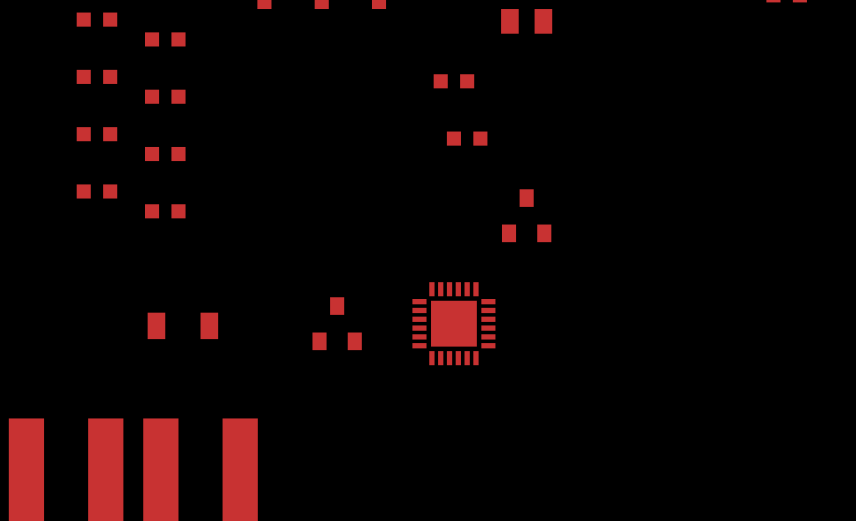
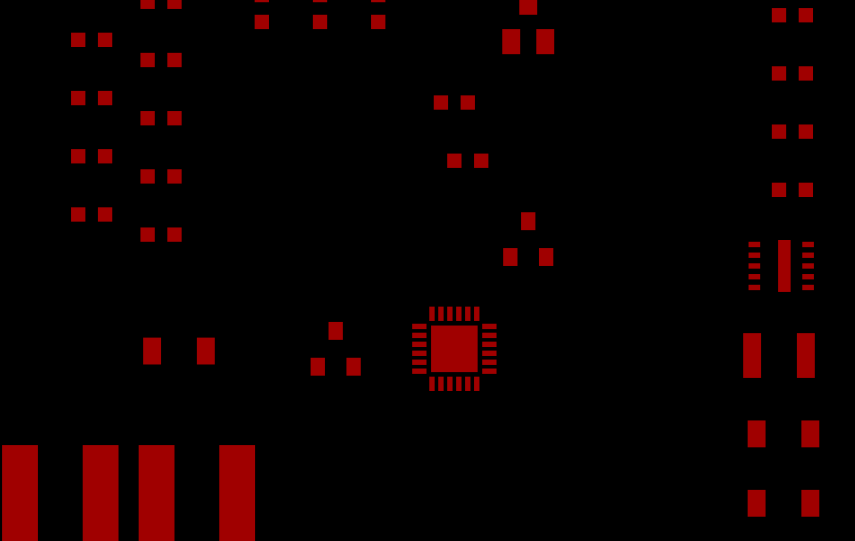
part: none -> (792, 73)
part: none -> (792, 131)
part: none -> (792, 189)
part: none -> (781, 265)
part: none -> (778, 355)
part: none -> (783, 433)
part: none -> (783, 503)

